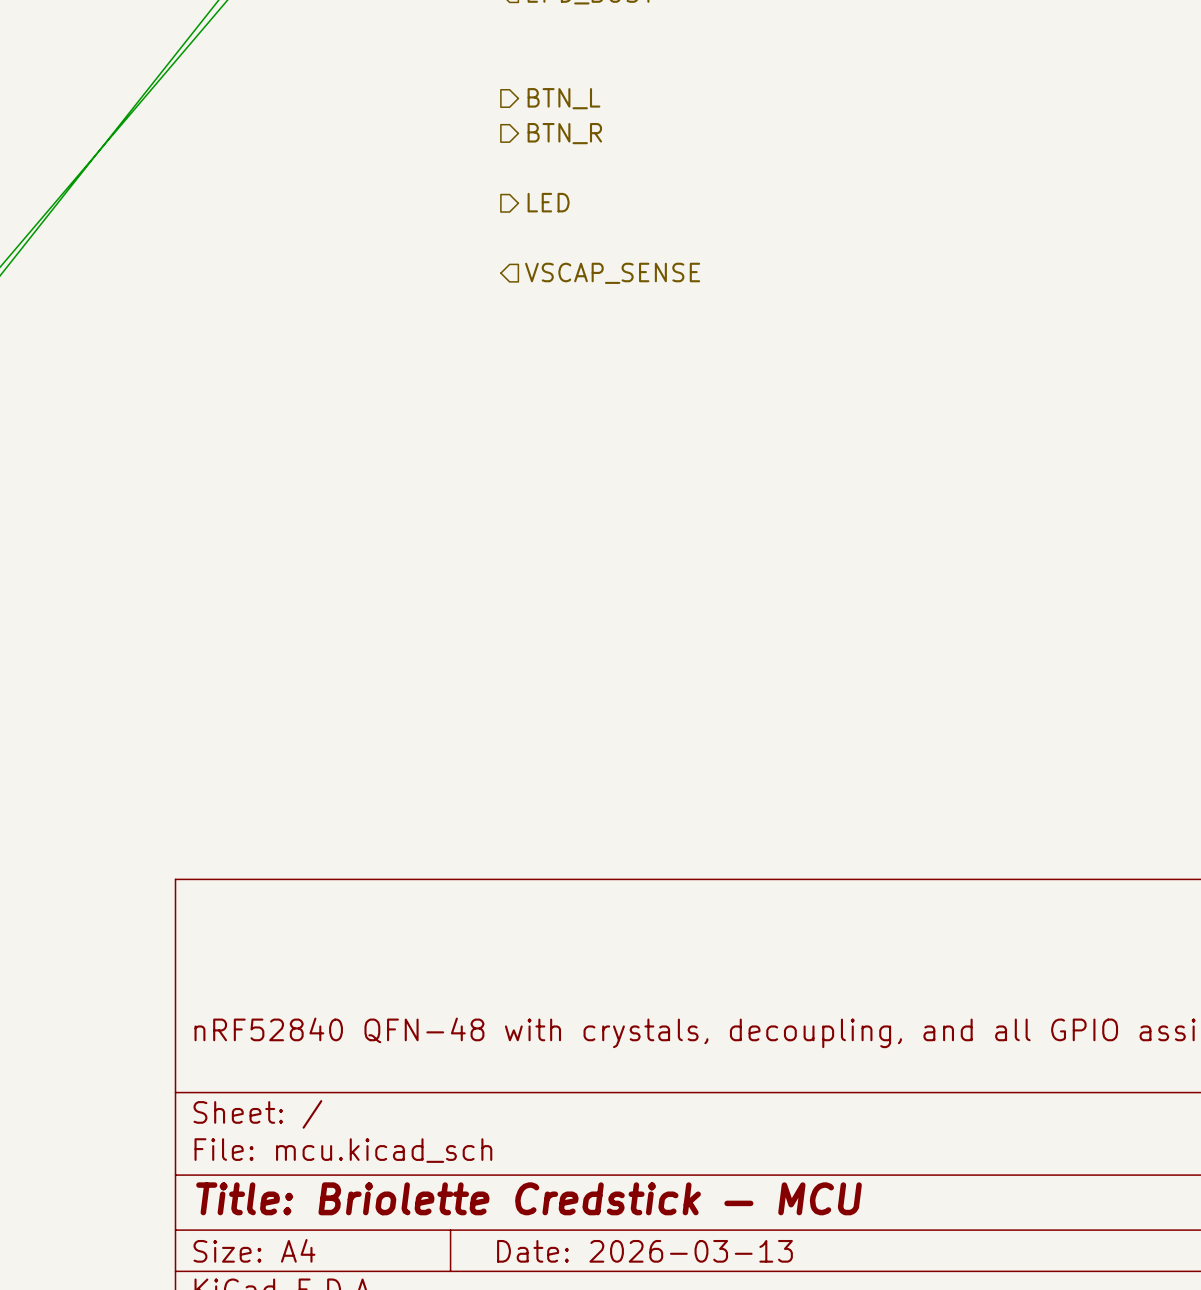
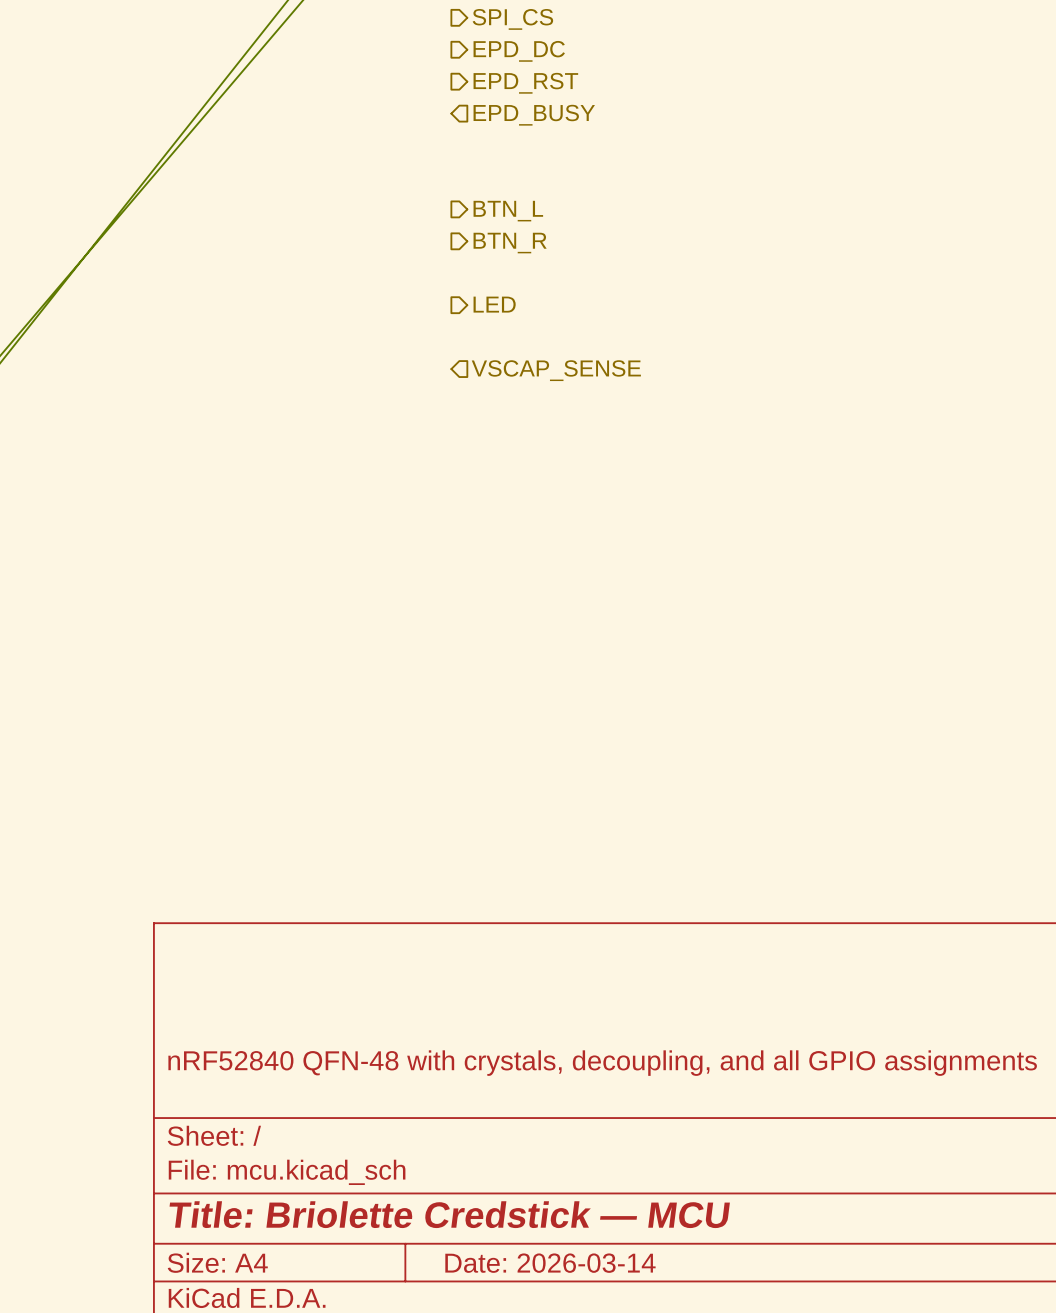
title block: Date: 2026-03-13 (644, 1251) -> Date: 2026-03-14 (550, 1263)

